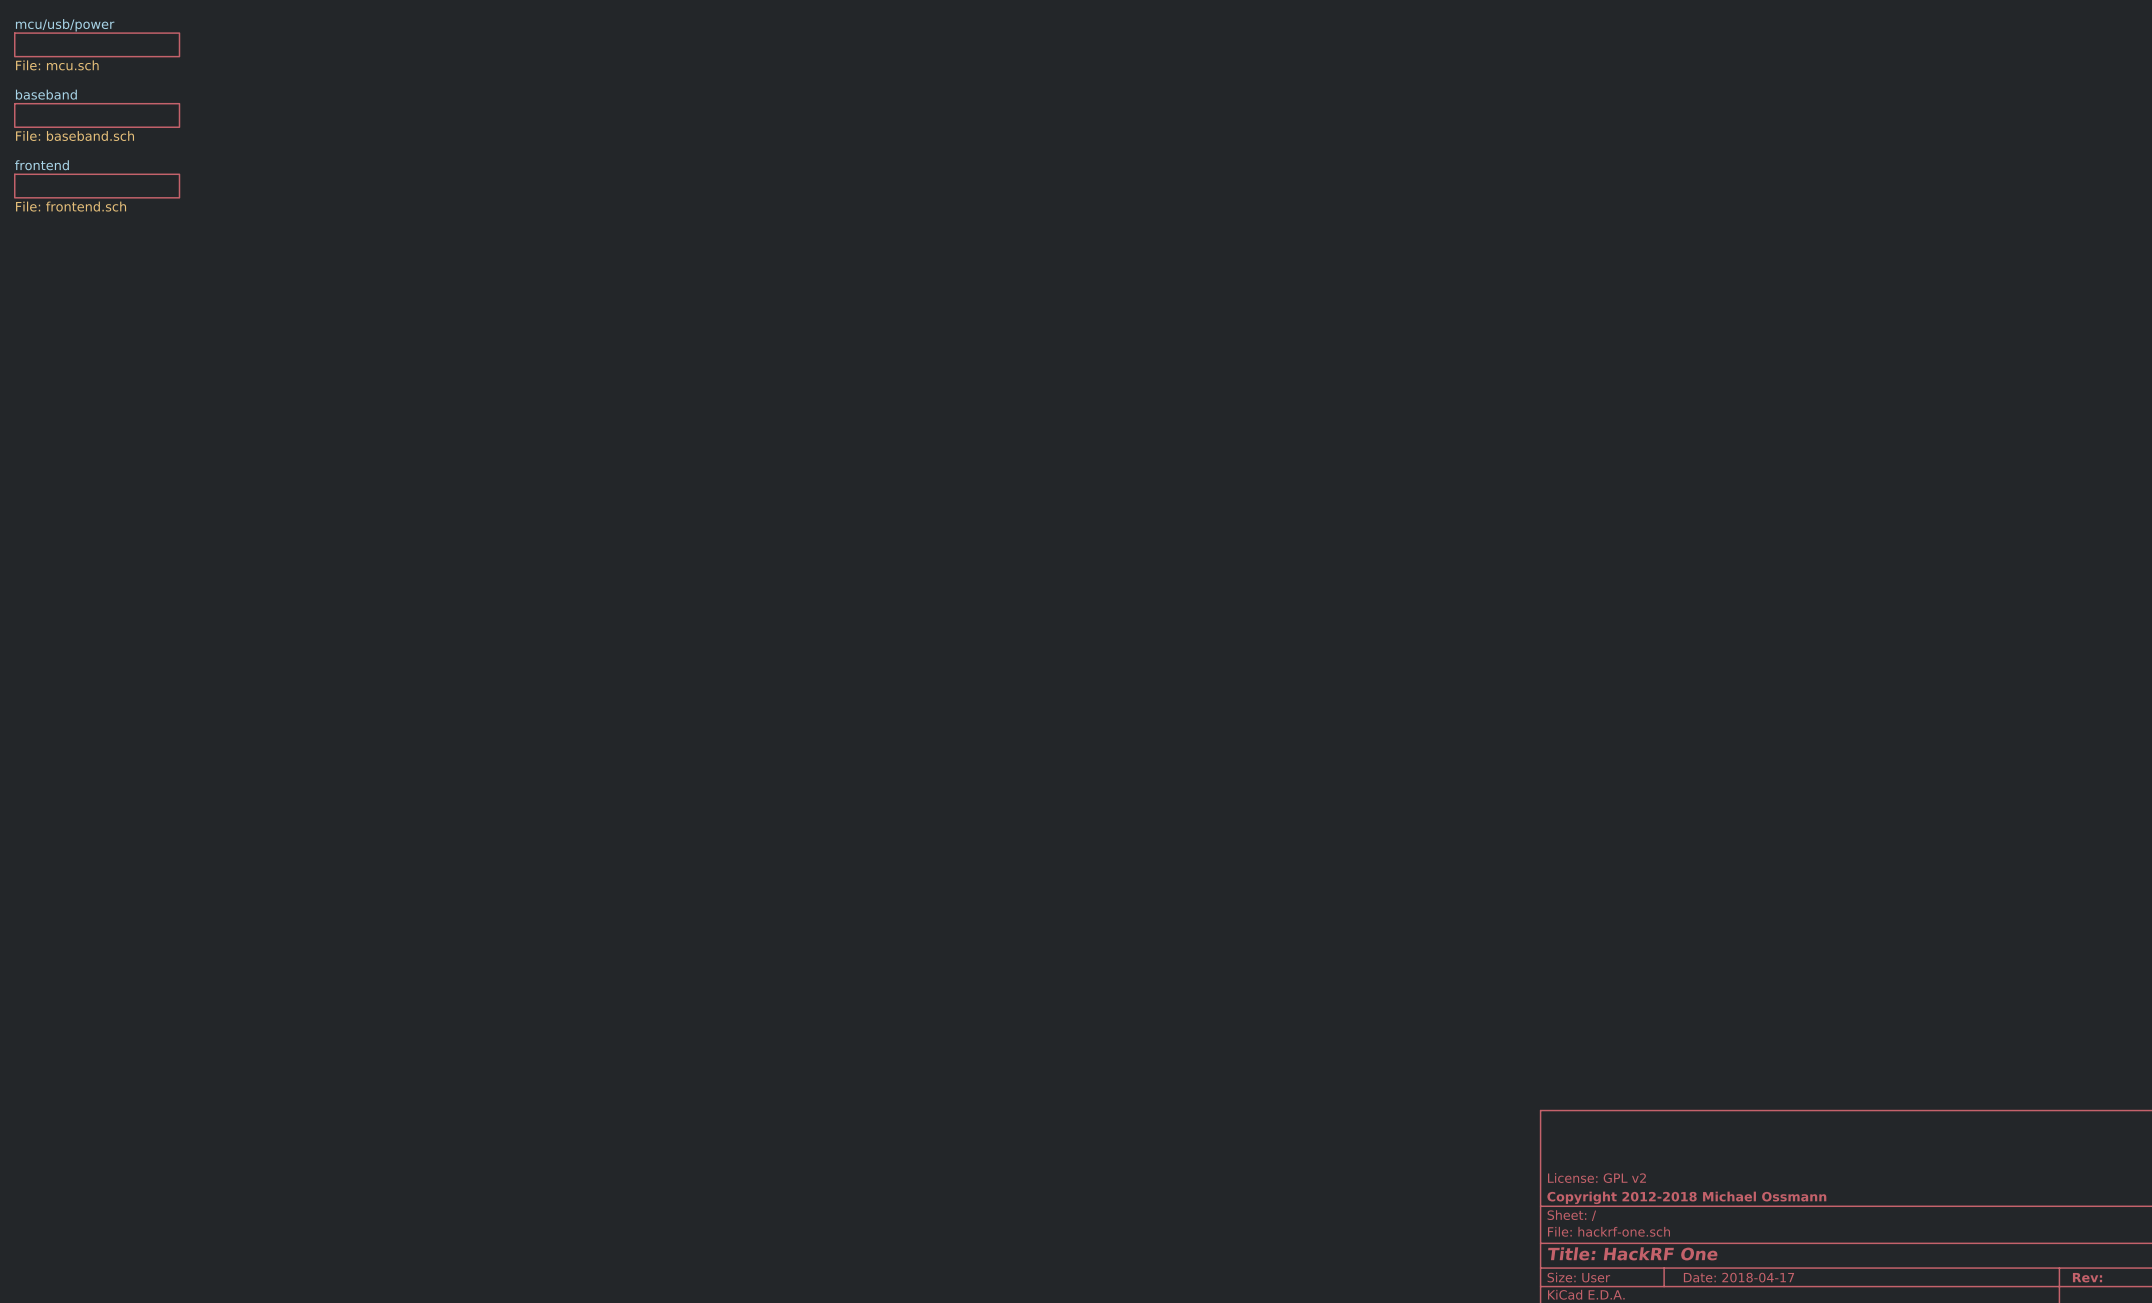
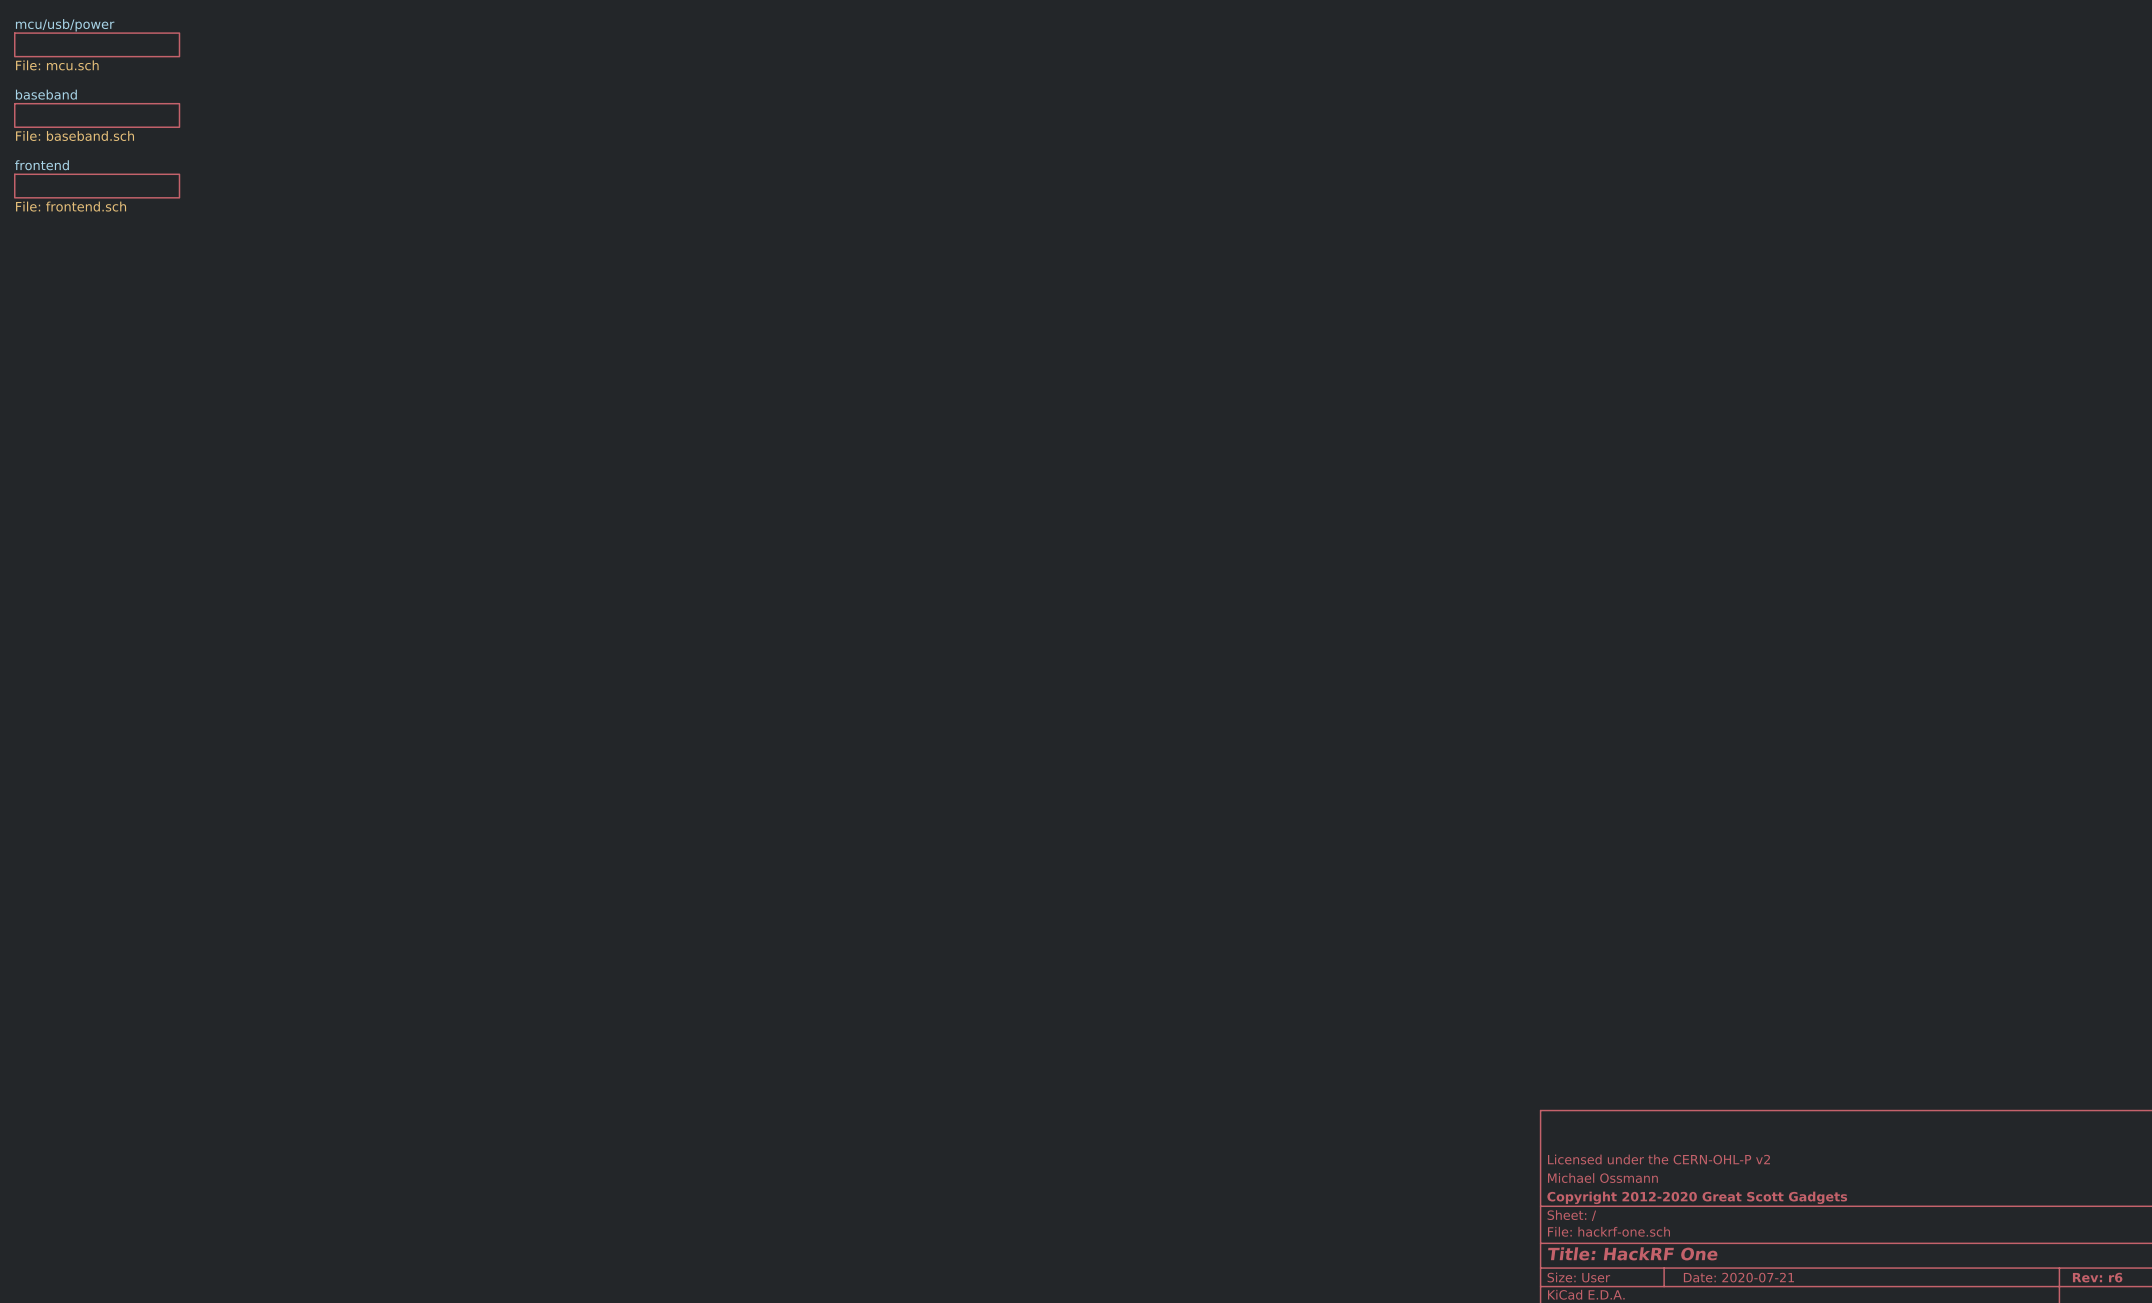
title block: none -> Licensed under the CERN-OHL-P v2 (1659, 1159)
title block: License: GPL v2 (1596, 1178) -> Michael Ossmann (1602, 1178)
title block: Copyright 2012-2018 Michael Ossmann (1686, 1197) -> Copyright 2012-2020 Great Scott Gadgets (1697, 1197)
title block: Date: 2018-04-17 (1738, 1277) -> Date: 2020-07-21 (1738, 1277)
title block: Rev: (2087, 1277) -> Rev: r6 (2097, 1277)

